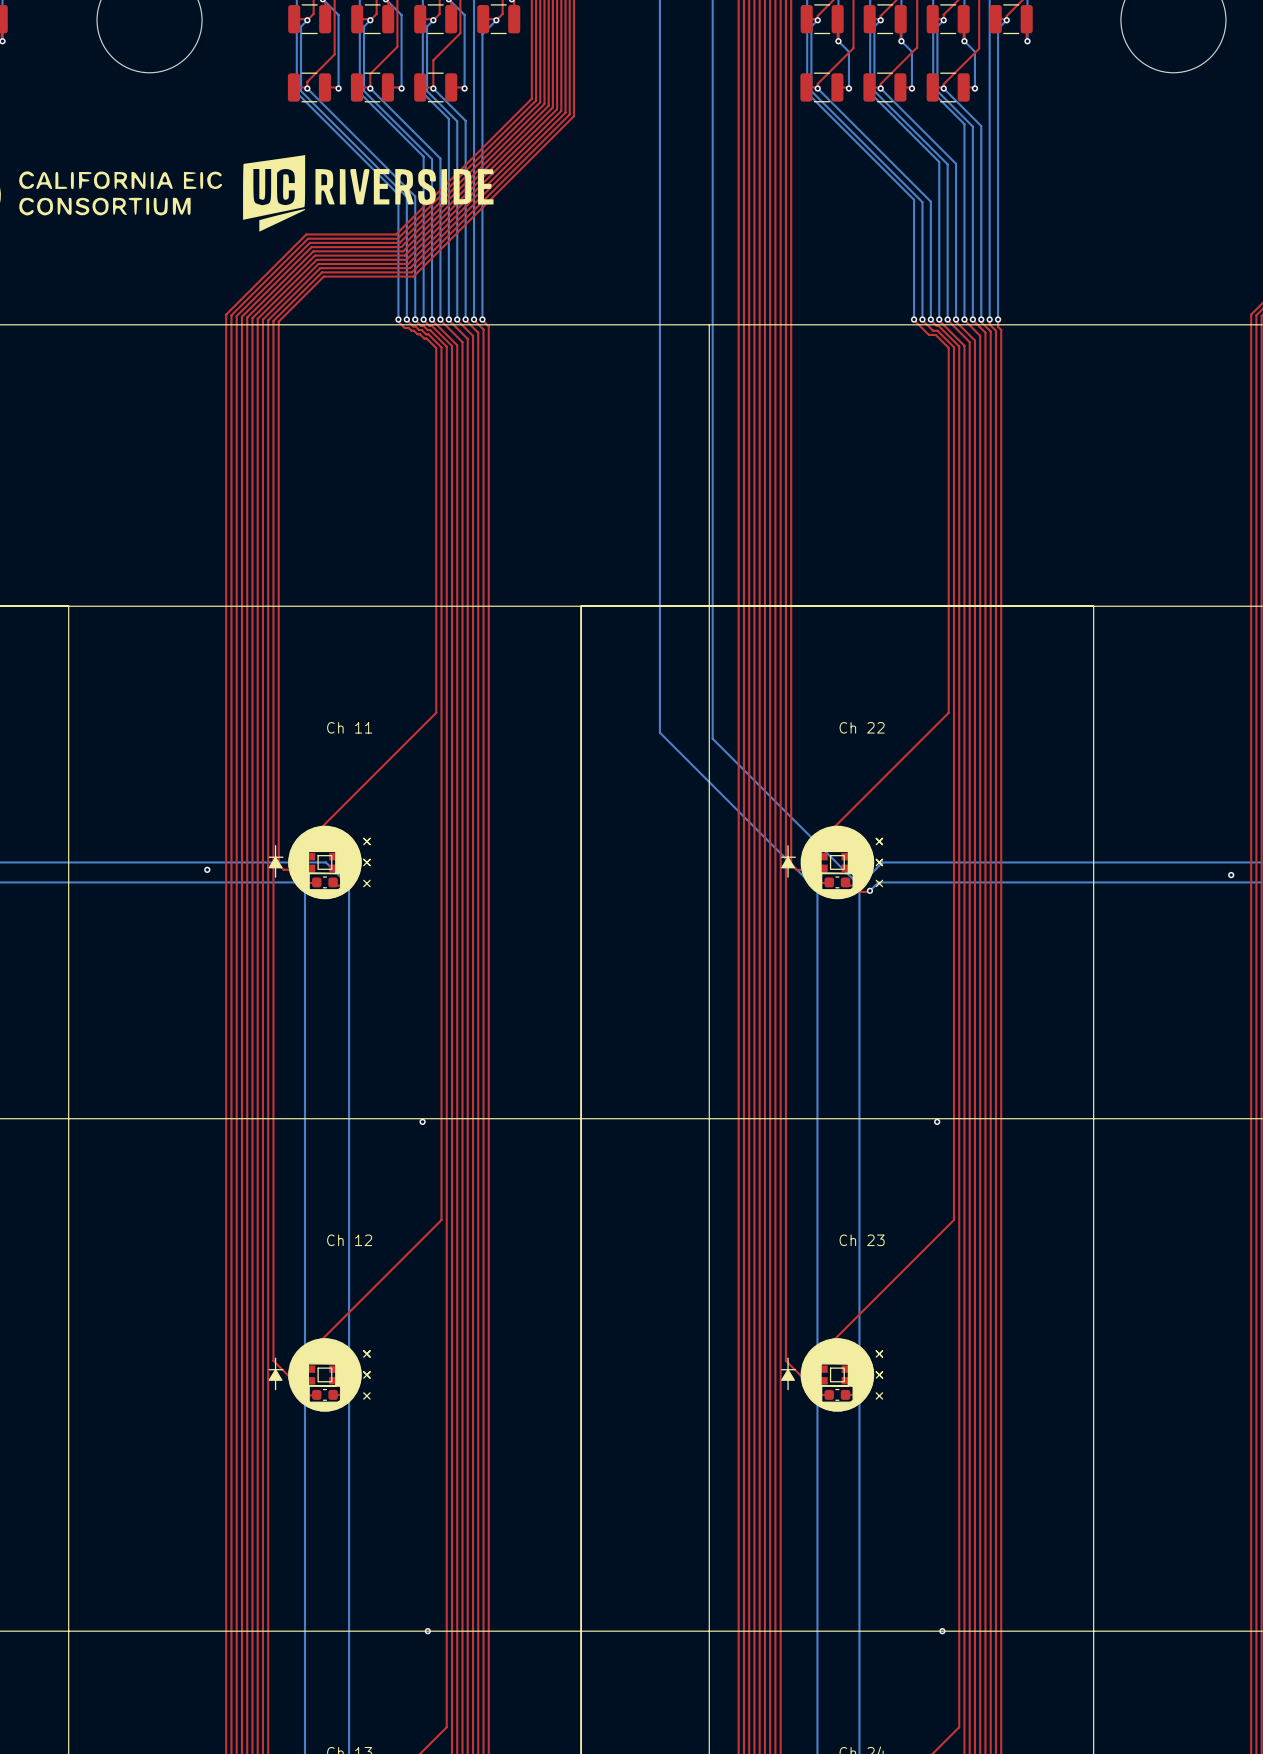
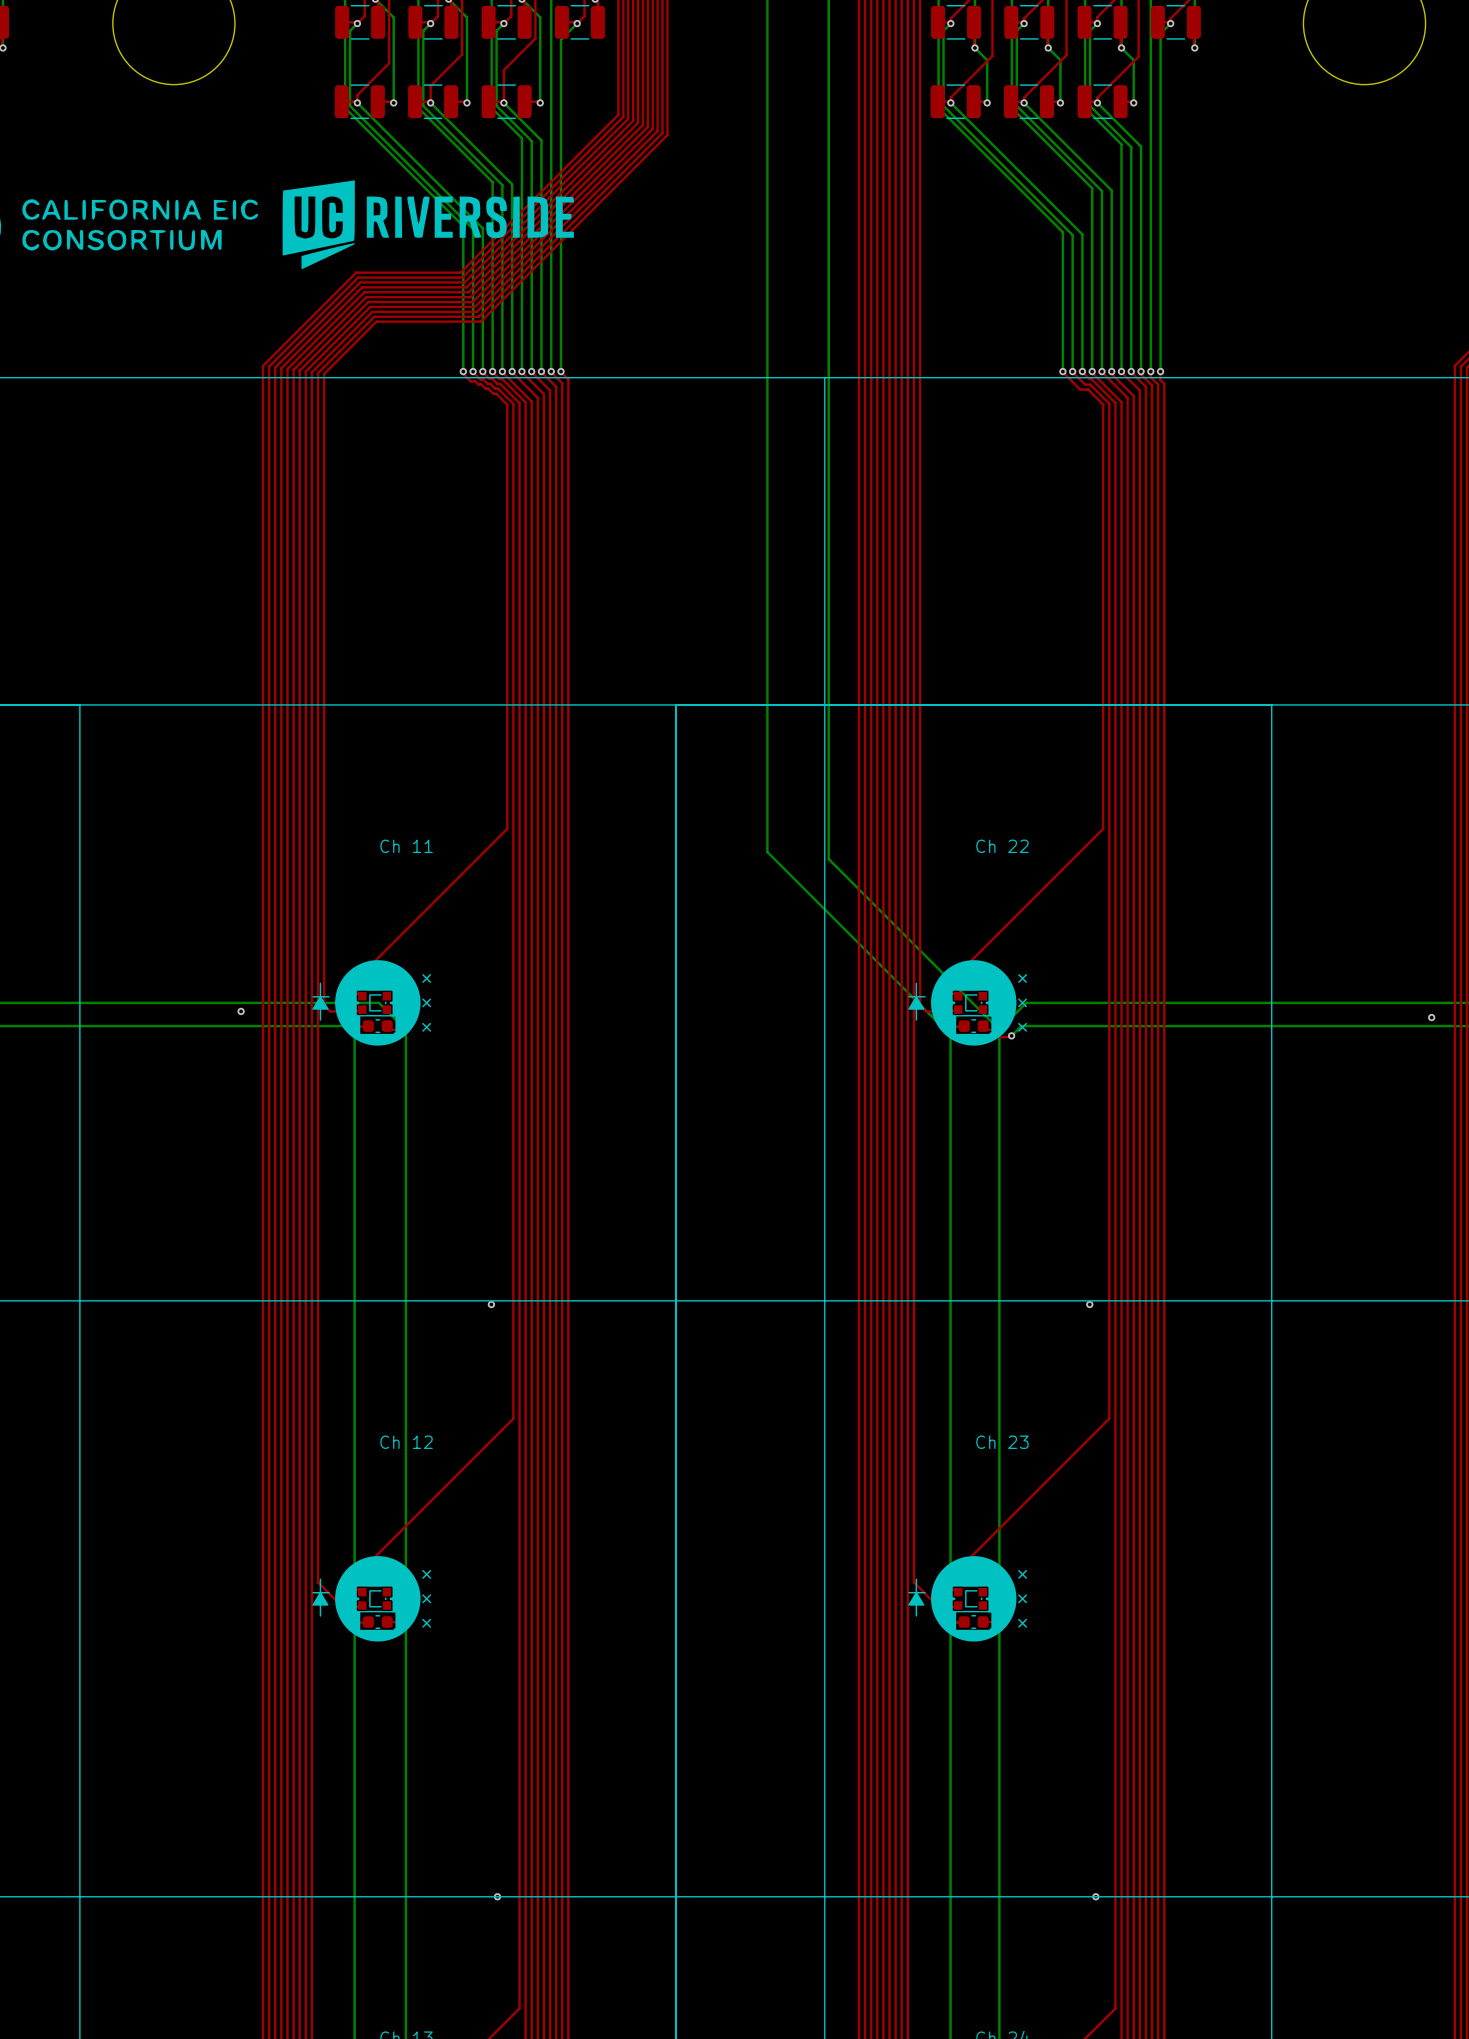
part footprint: [268, 825, 371, 900] -> [312, 960, 432, 1046]
part footprint: [781, 825, 884, 900] -> [908, 960, 1027, 1046]
part footprint: [268, 1338, 371, 1412] -> [312, 1556, 432, 1642]
part footprint: [781, 1338, 884, 1412] -> [908, 1556, 1027, 1642]

